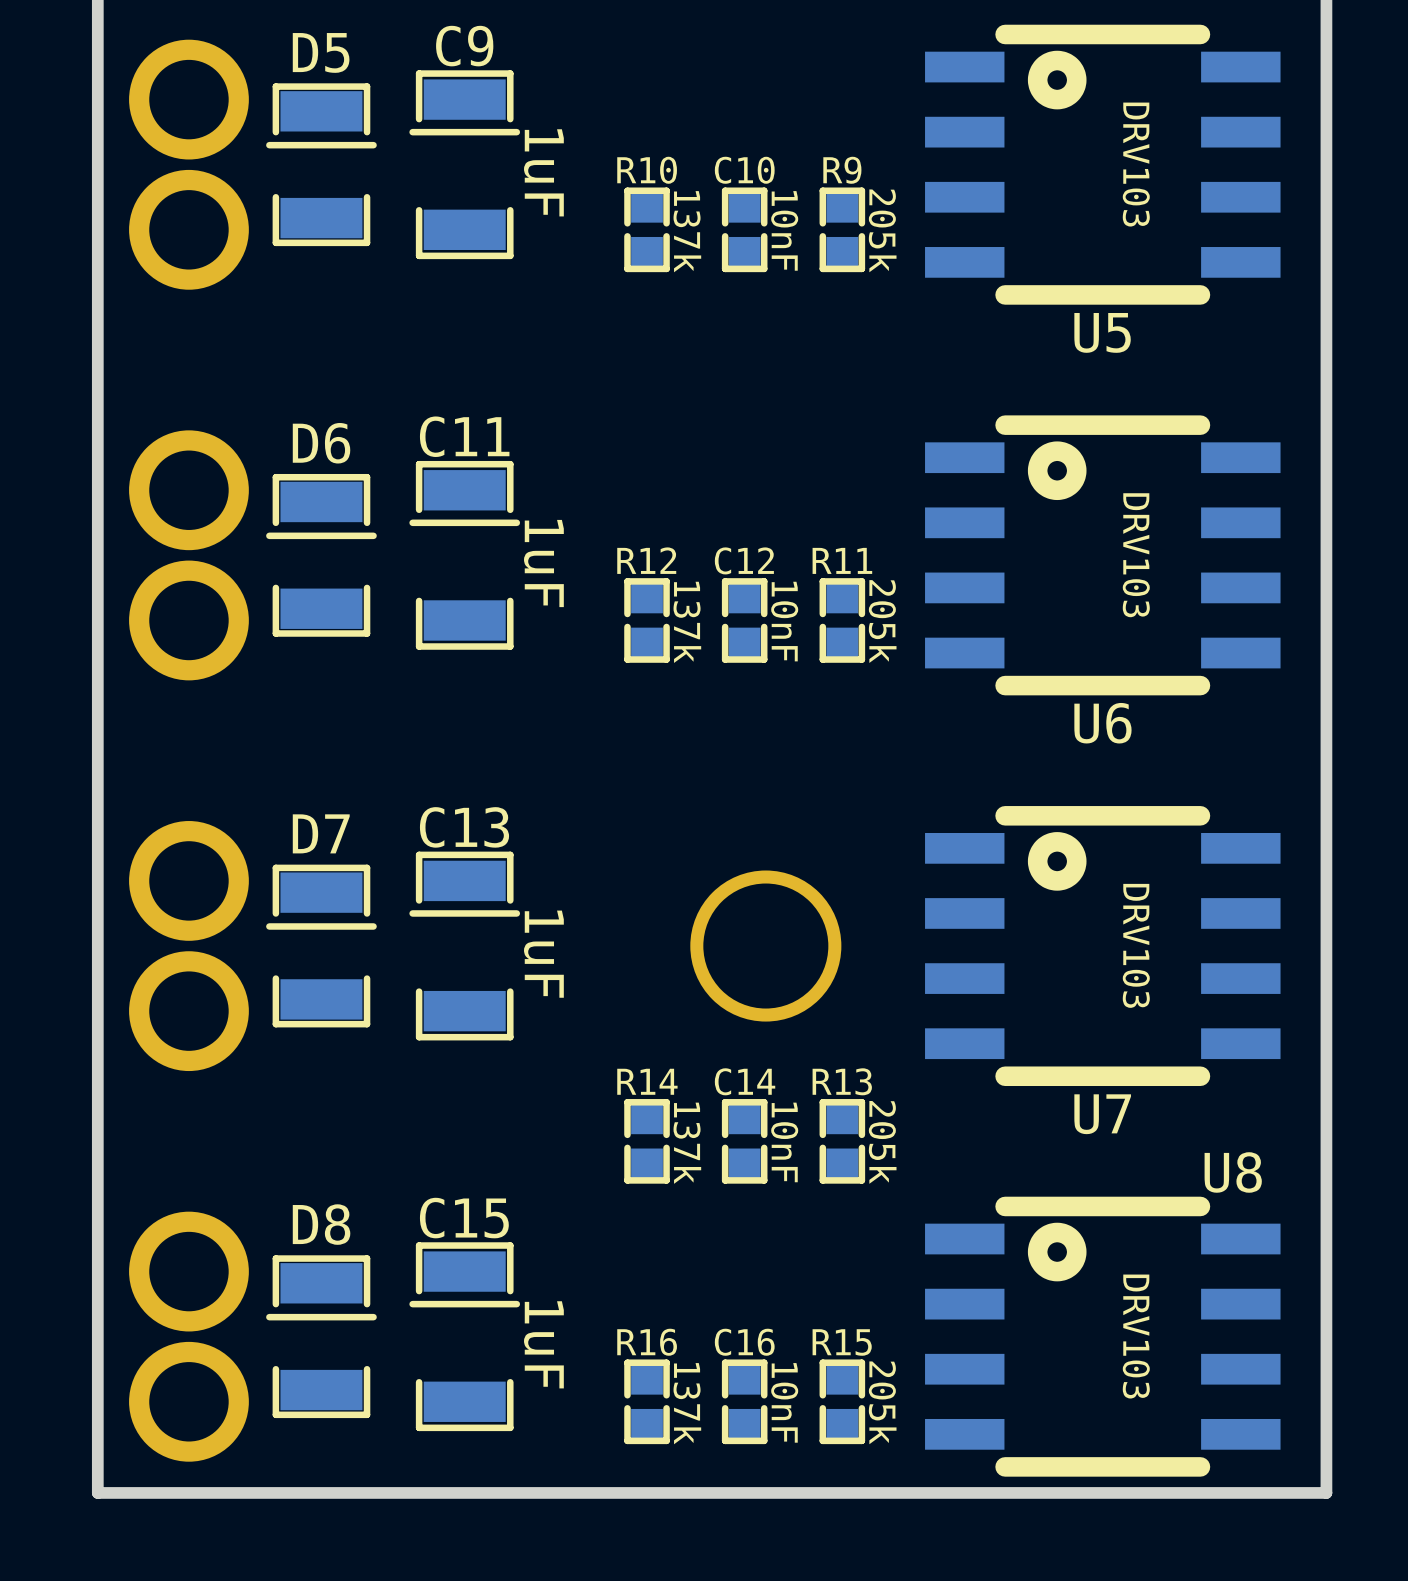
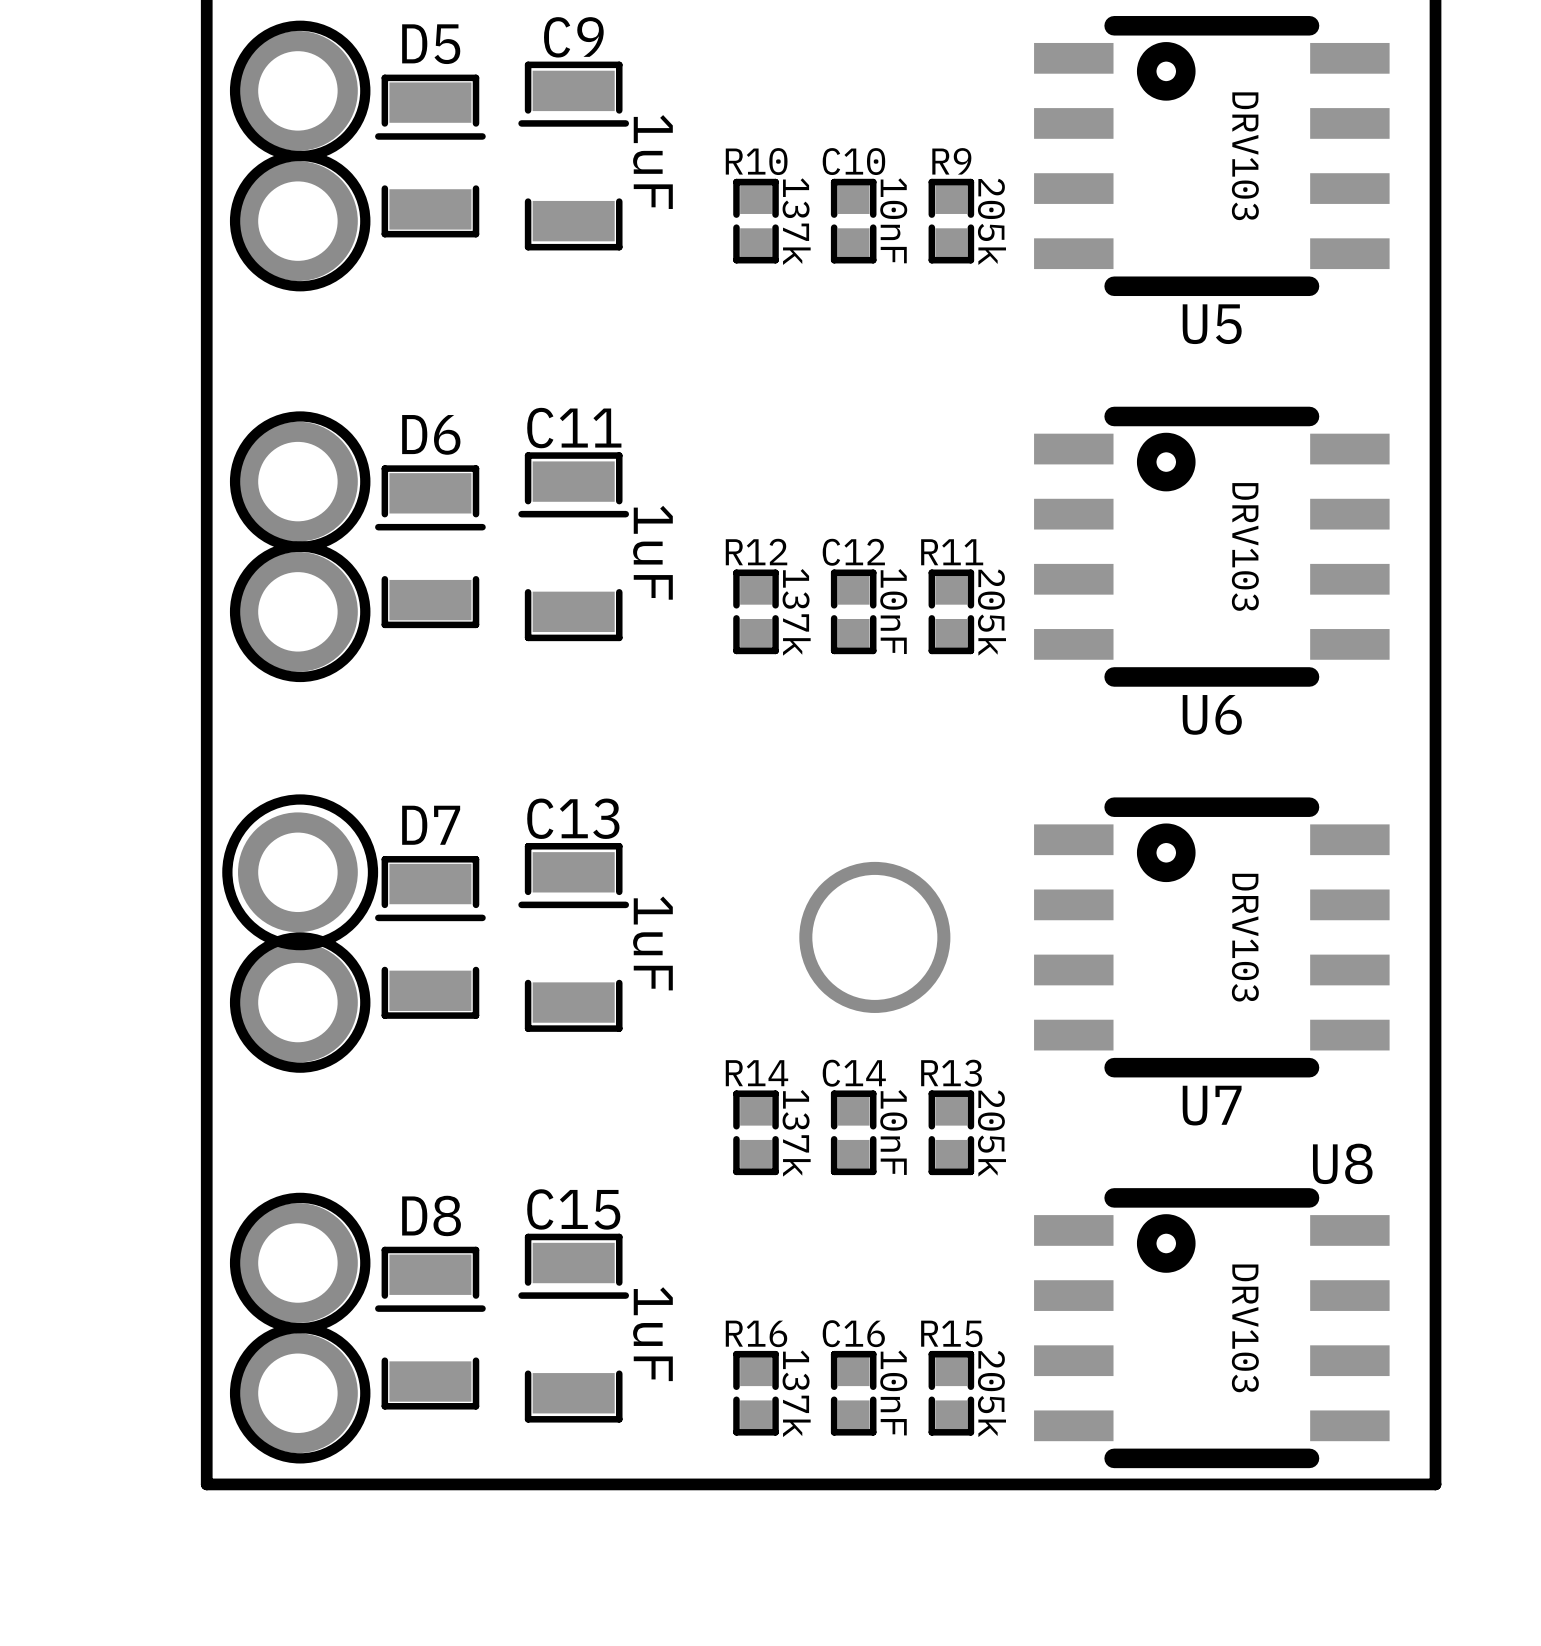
drawing: none -> [229, 20, 371, 292]
drawing: none -> [229, 411, 371, 683]
drawing: none -> [222, 794, 379, 1073]
drawing: none -> [229, 1192, 371, 1464]

